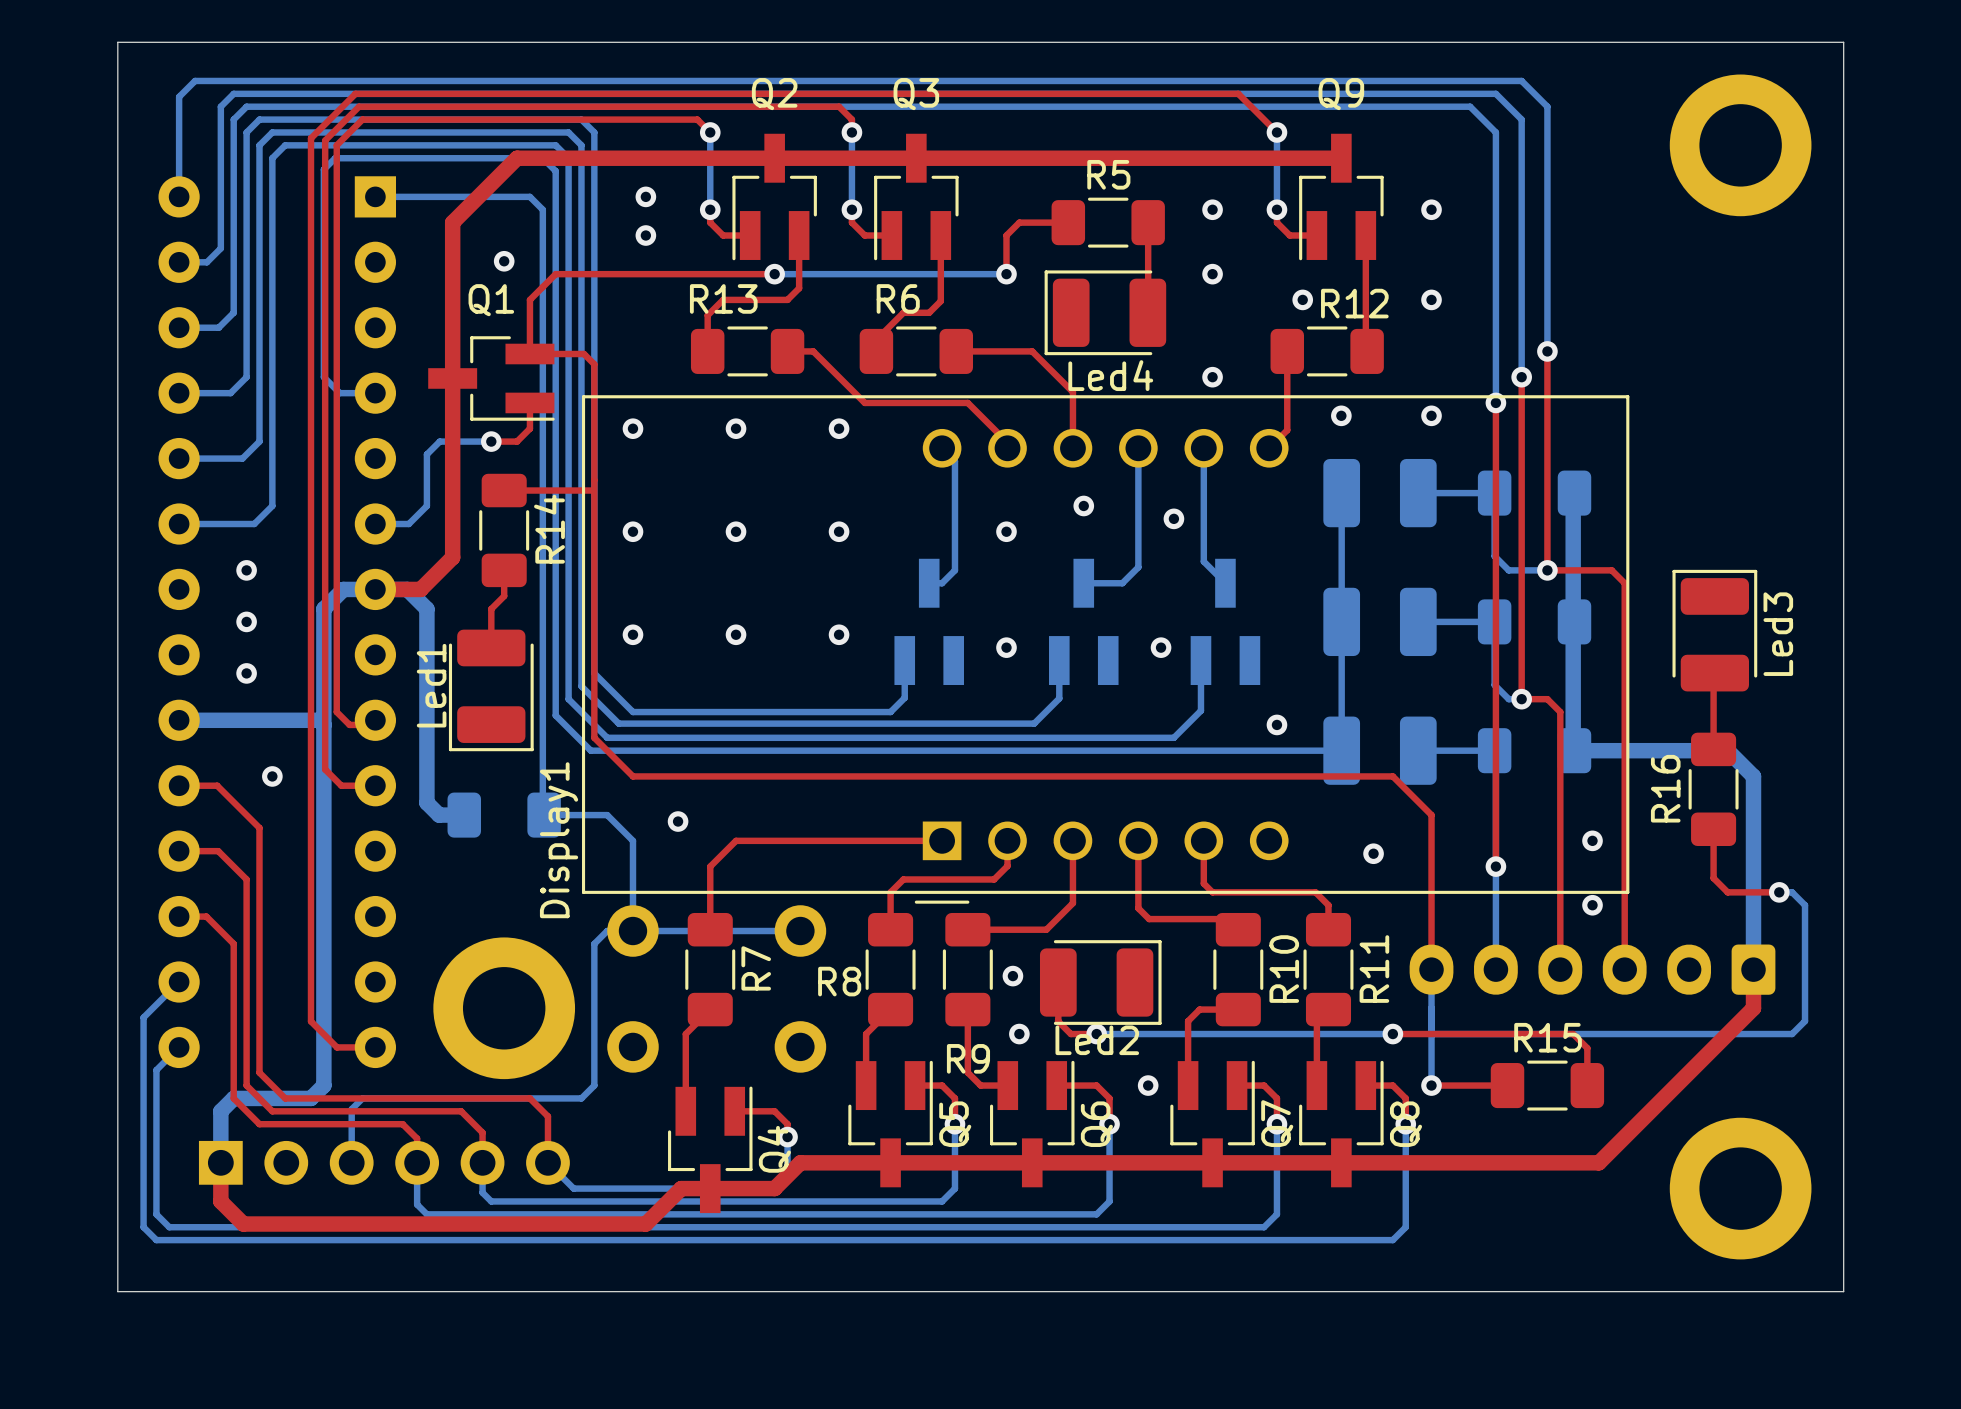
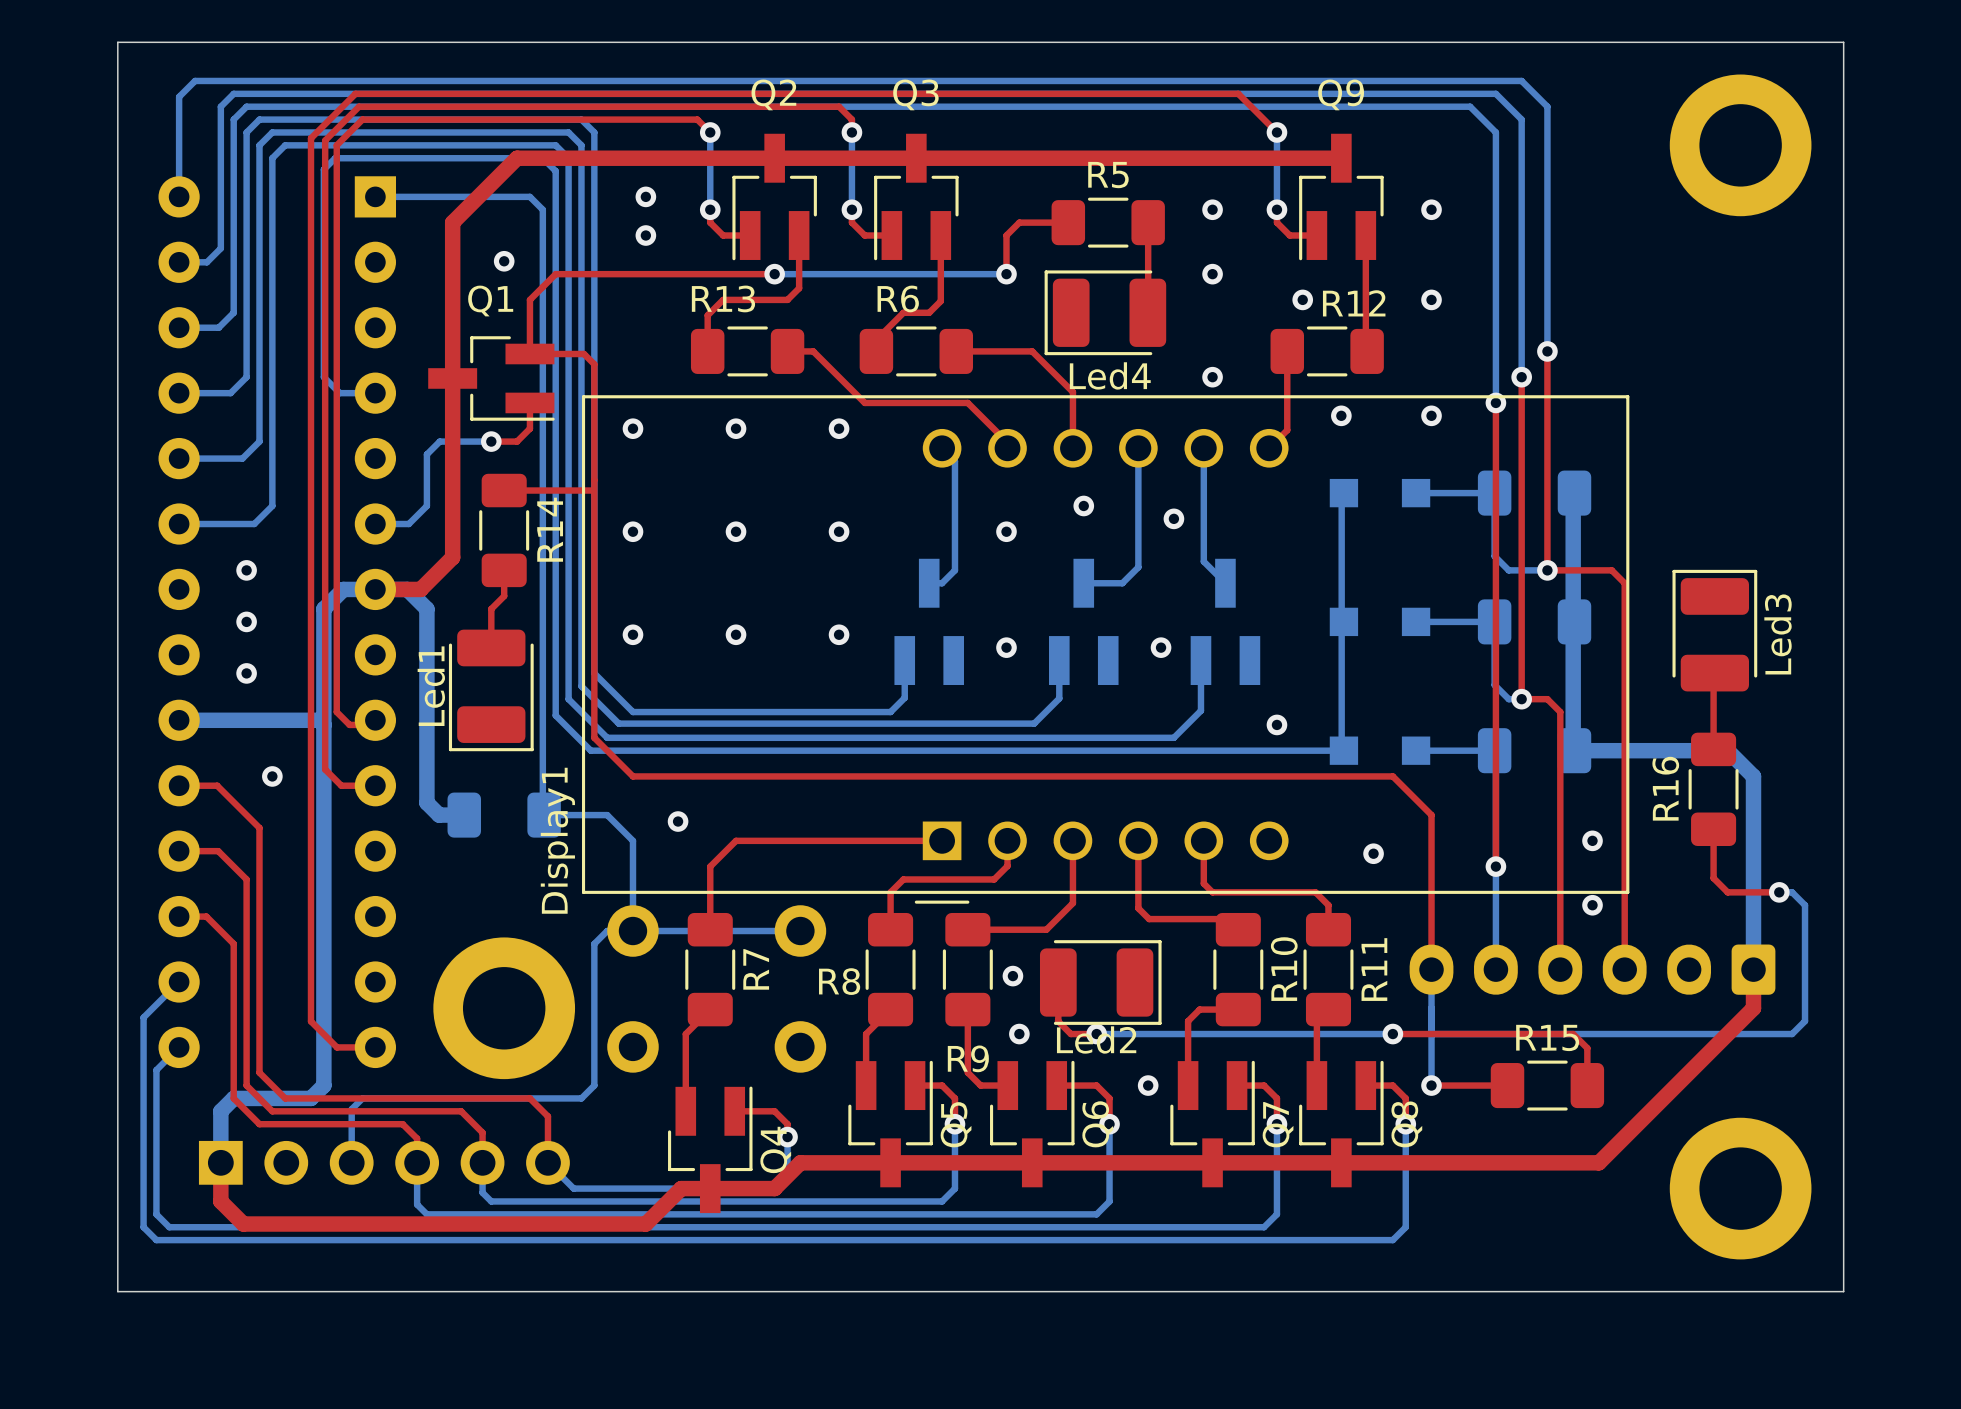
part footprint: [1323, 458, 1437, 528] -> [1329, 478, 1431, 508]
part footprint: [1323, 587, 1437, 657] -> [1329, 607, 1431, 637]
part footprint: [1323, 716, 1437, 785] -> [1329, 736, 1431, 765]

